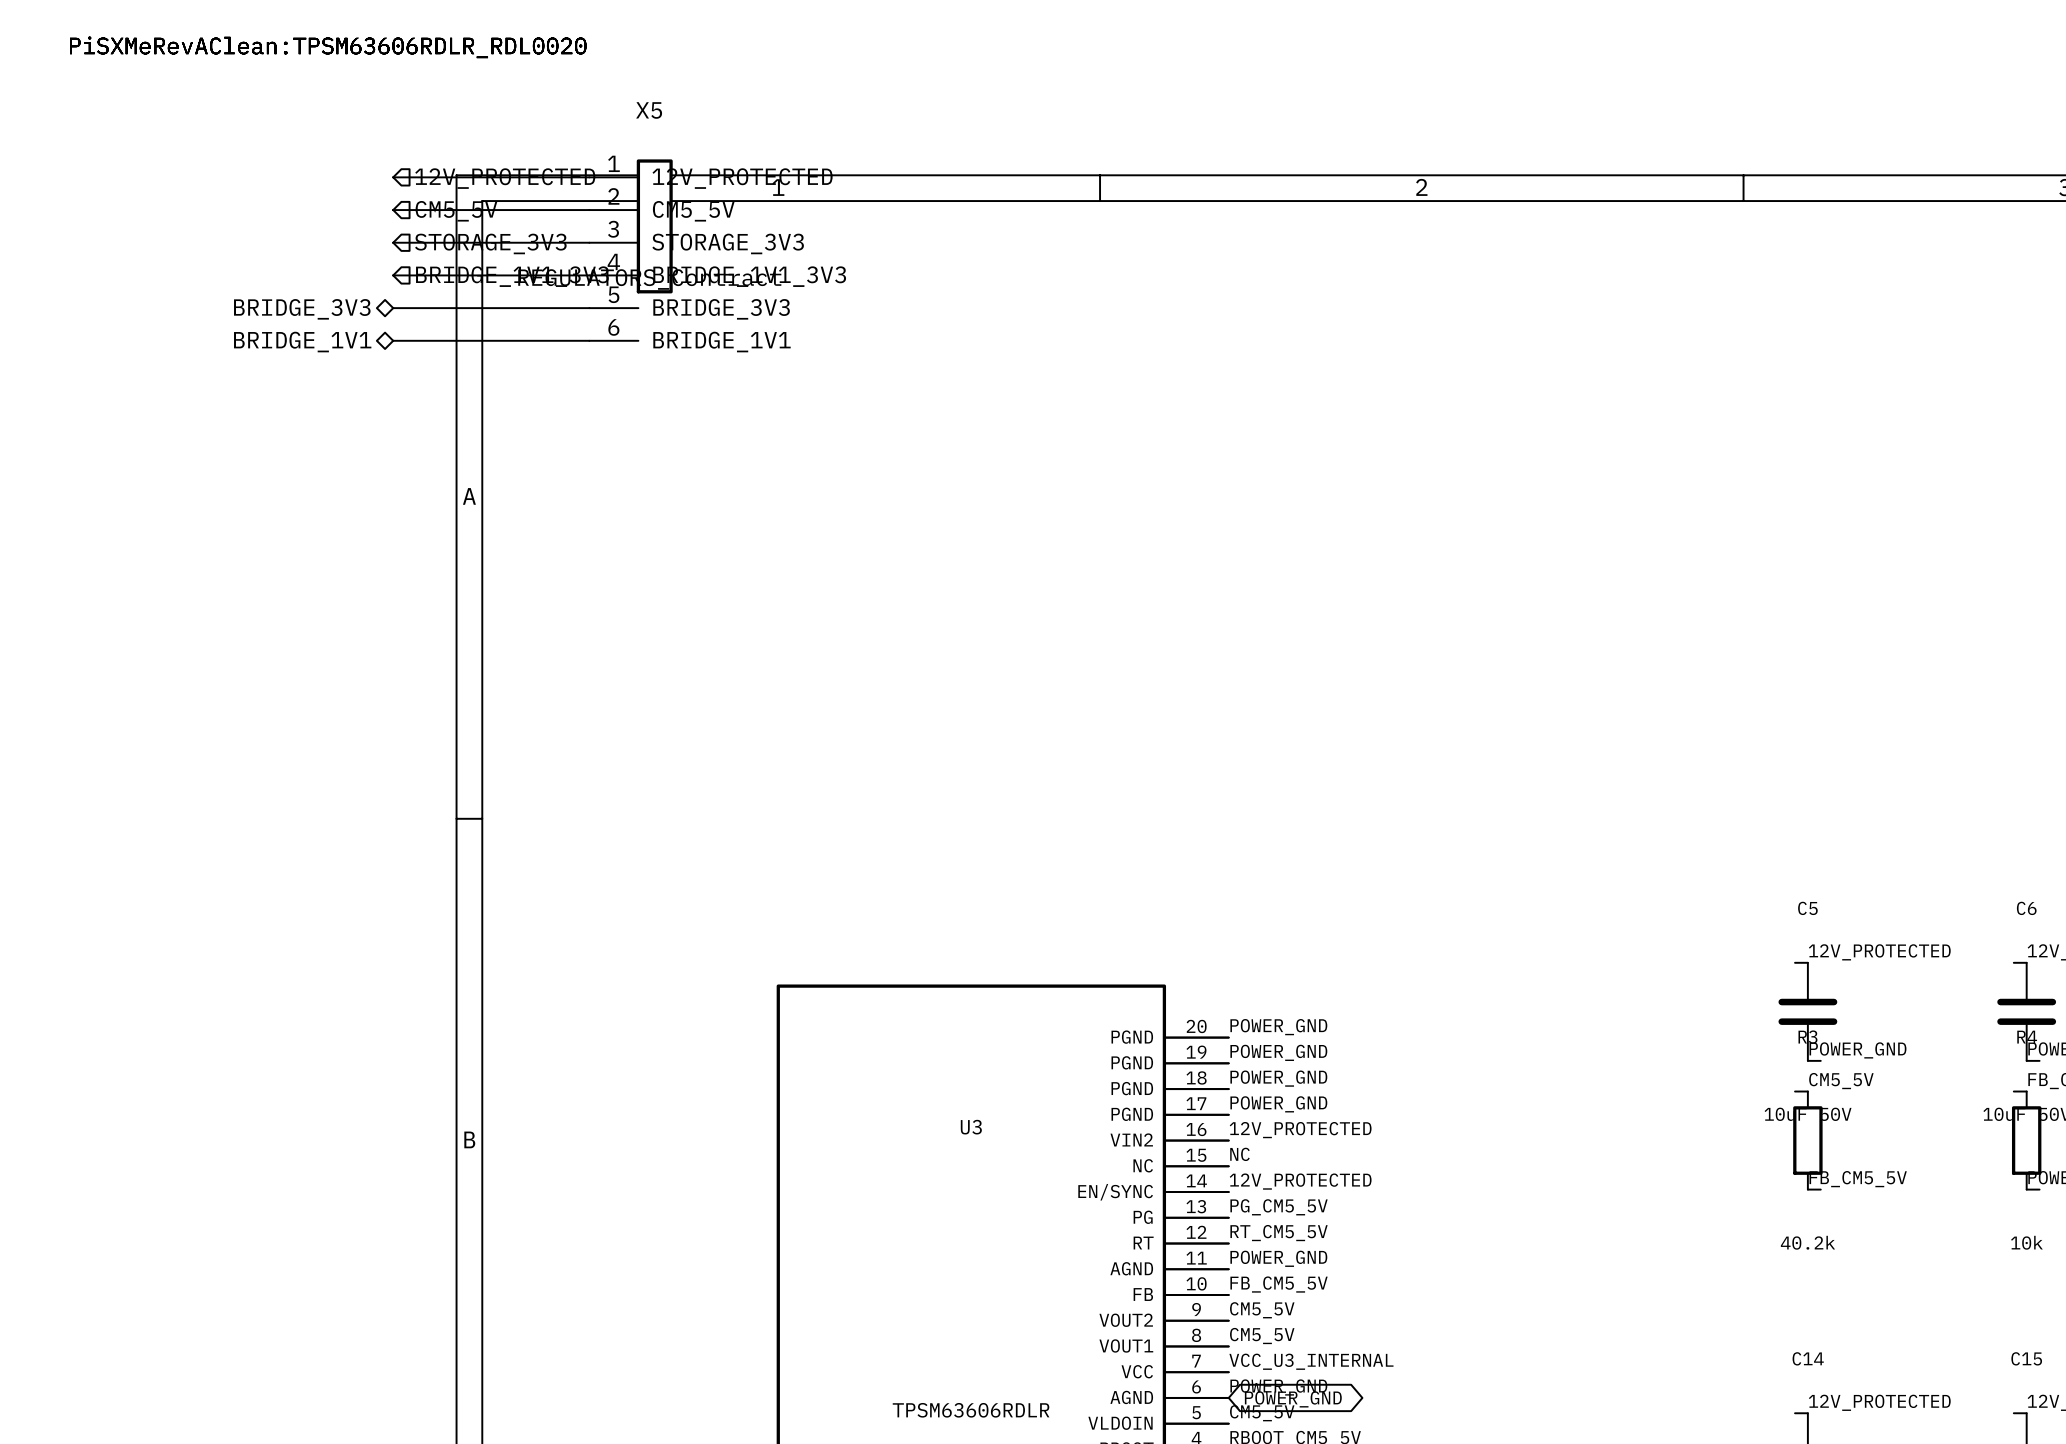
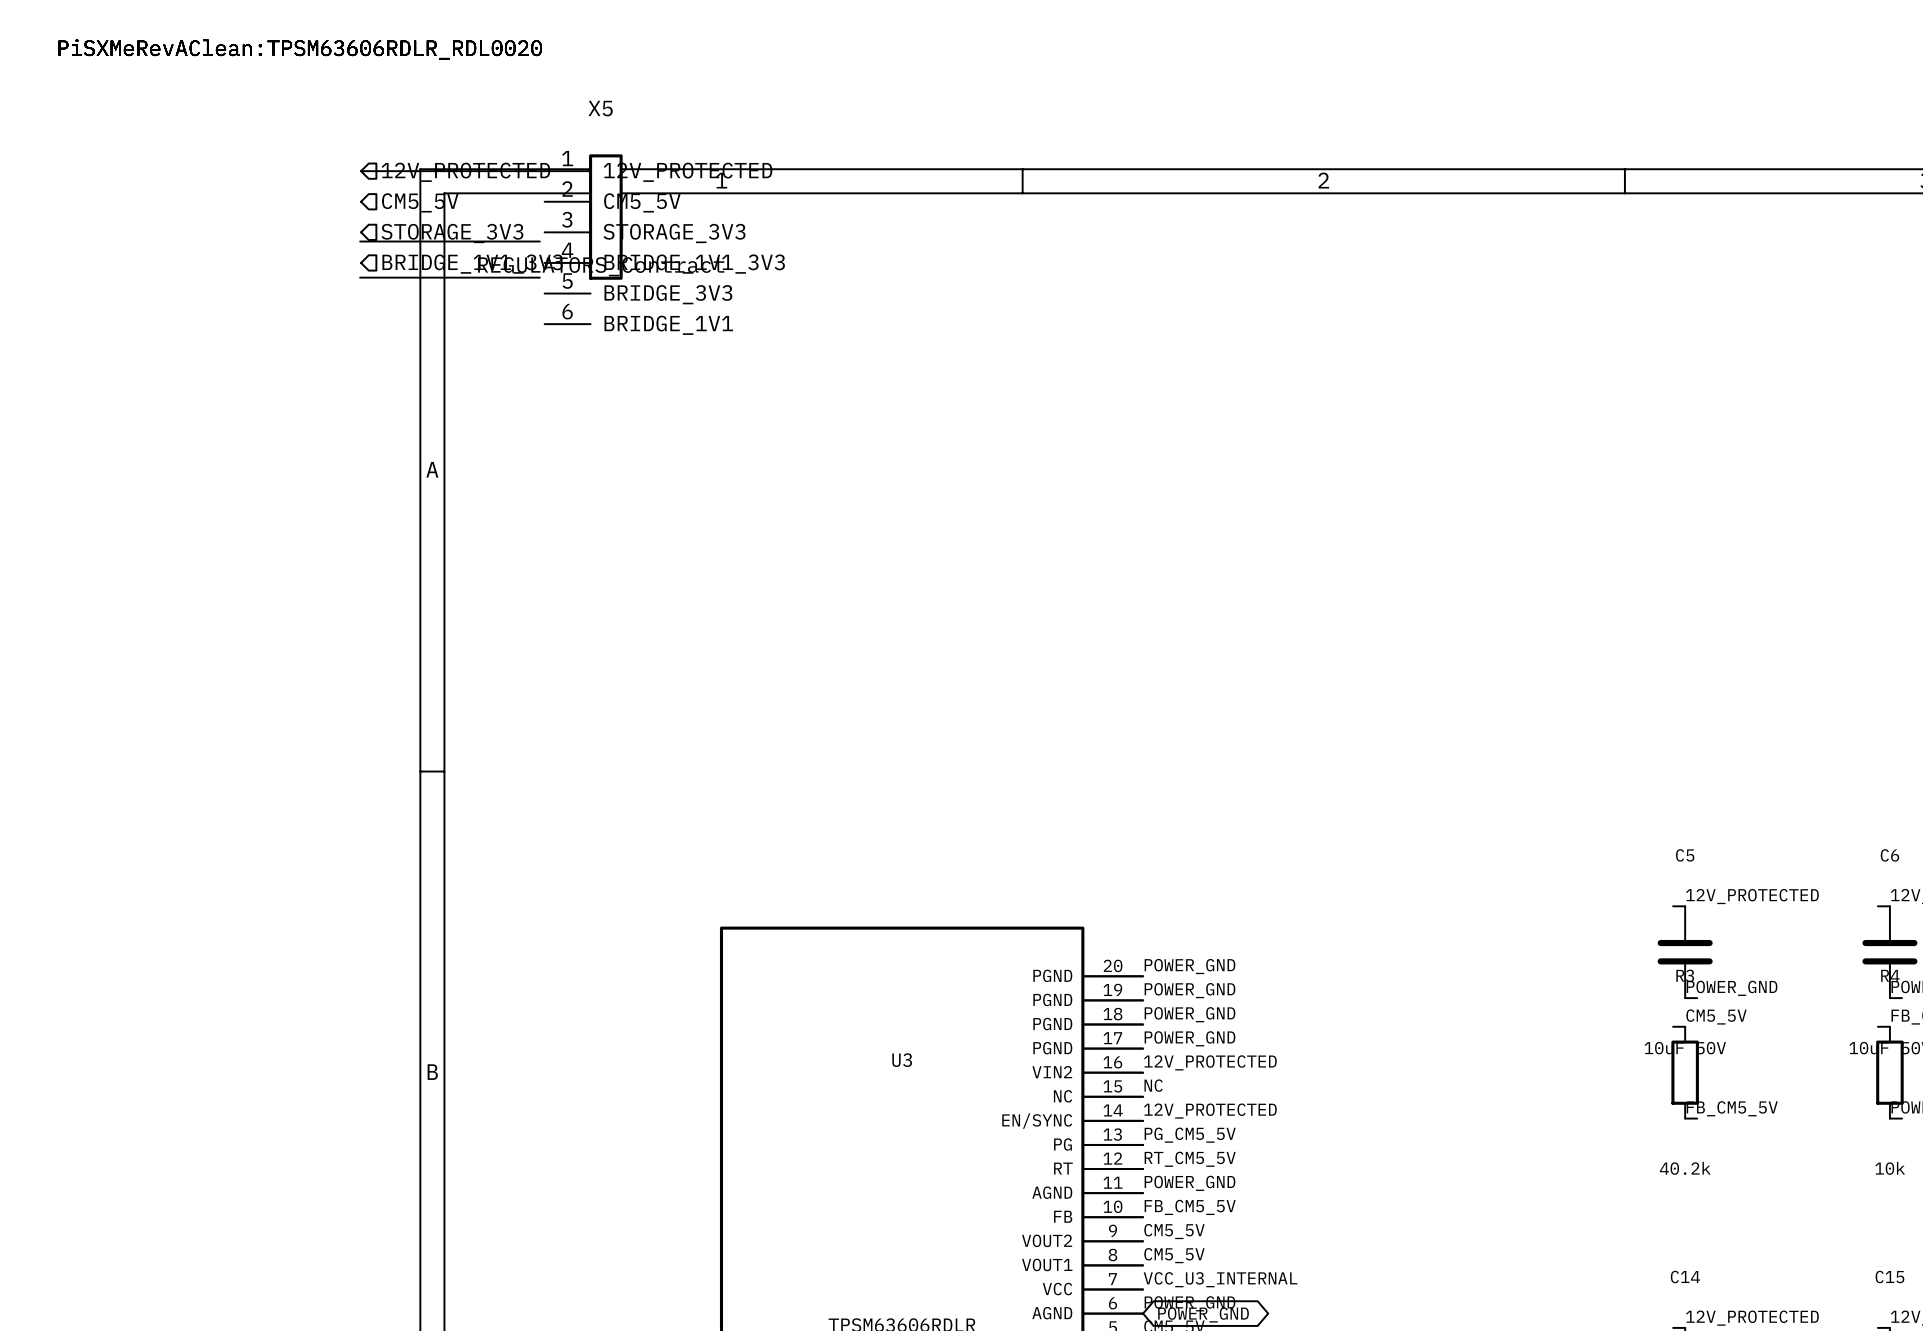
wire: (393, 210) (589, 210) -> none
wire: (393, 242) (589, 242) -> none
wire: none -> (360, 241) (539, 241)
wire: (393, 275) (589, 275) -> none
wire: none -> (360, 277) (539, 277)
wire: (393, 308) (589, 308) -> none
hierarchical label: BRIDGE_3V3 (302, 309) -> none
wire: (393, 340) (589, 340) -> none
hierarchical label: BRIDGE_1V1 (302, 342) -> none

